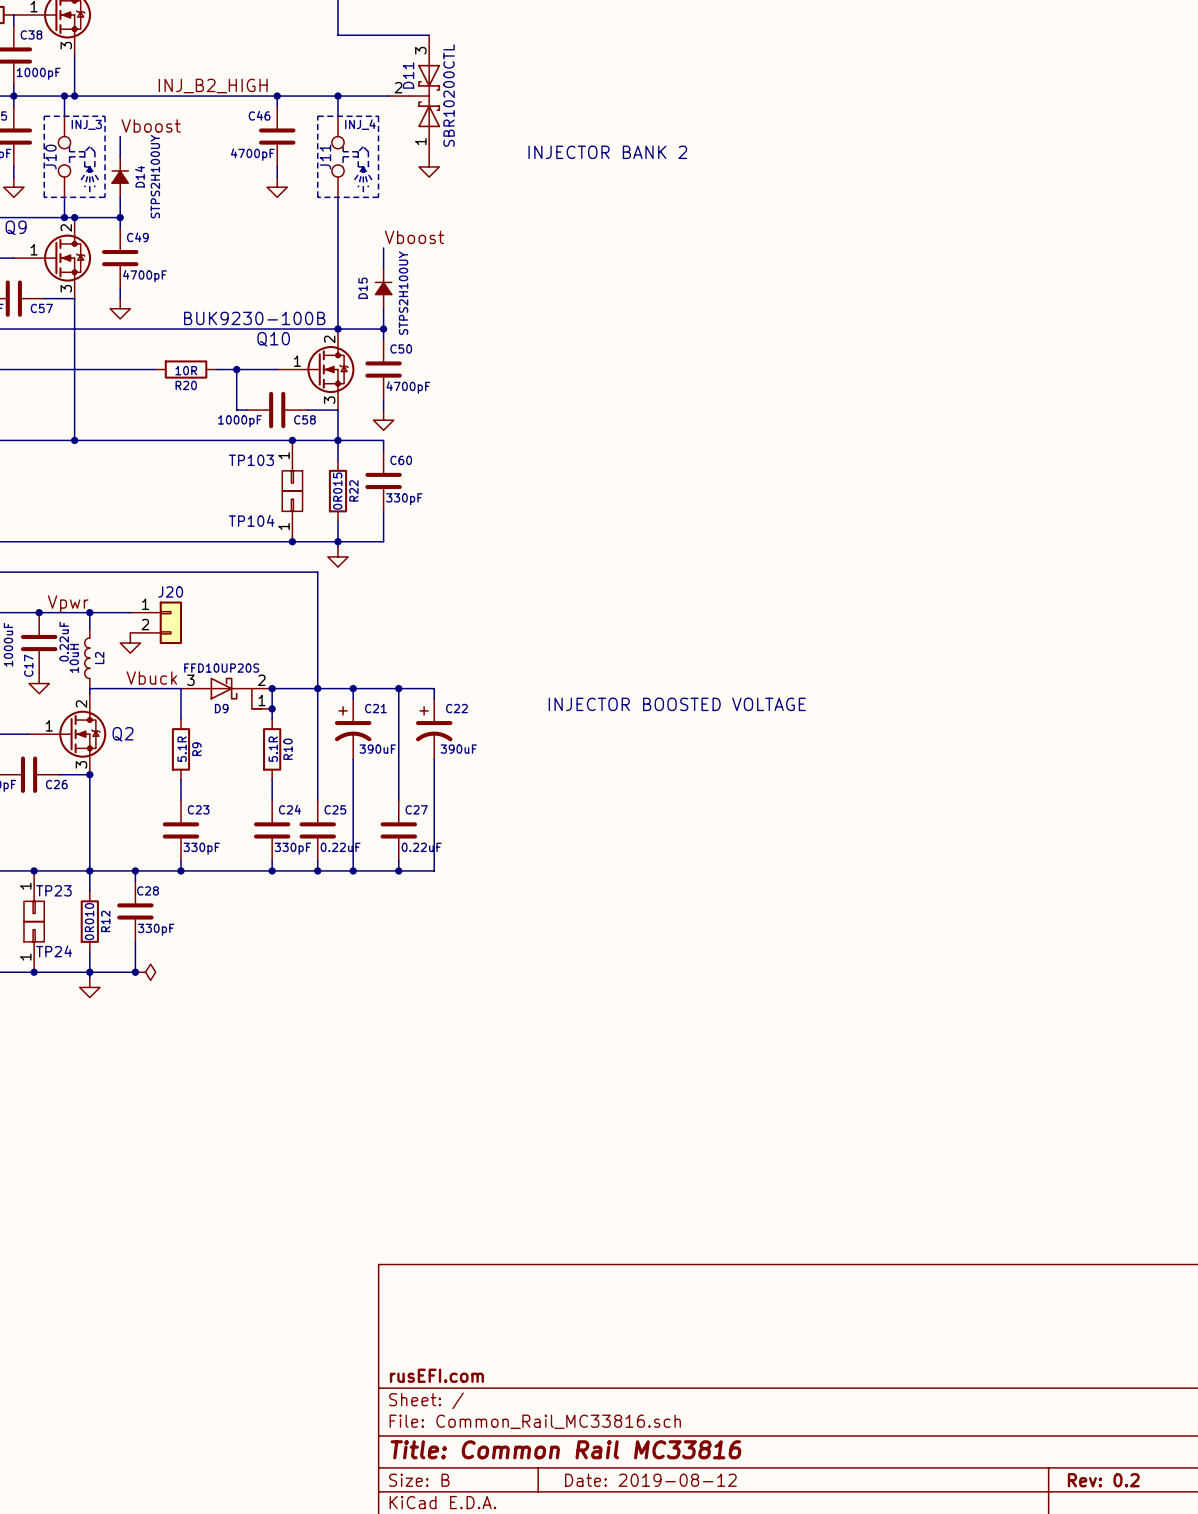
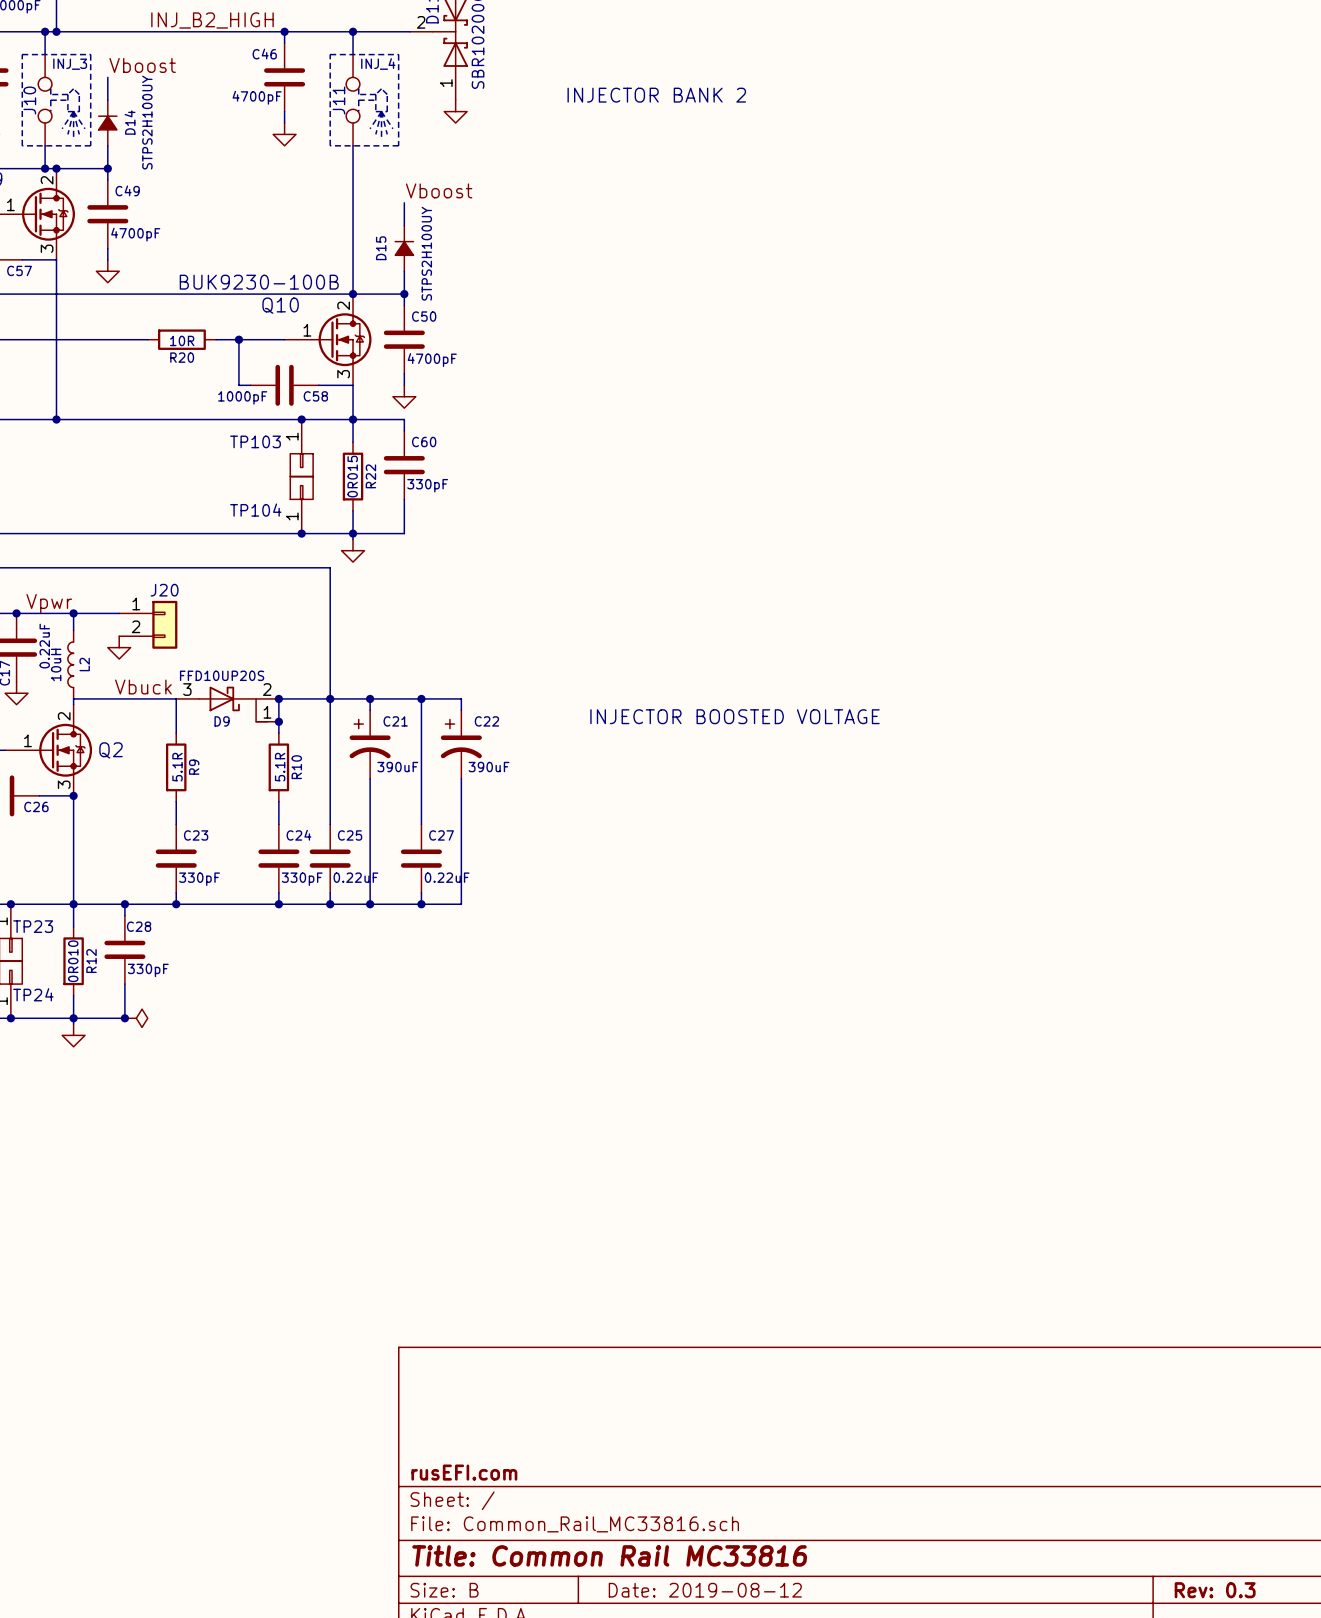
title block: Rev: 0.2 (1103, 1480) -> Rev: 0.3 (1215, 1590)

